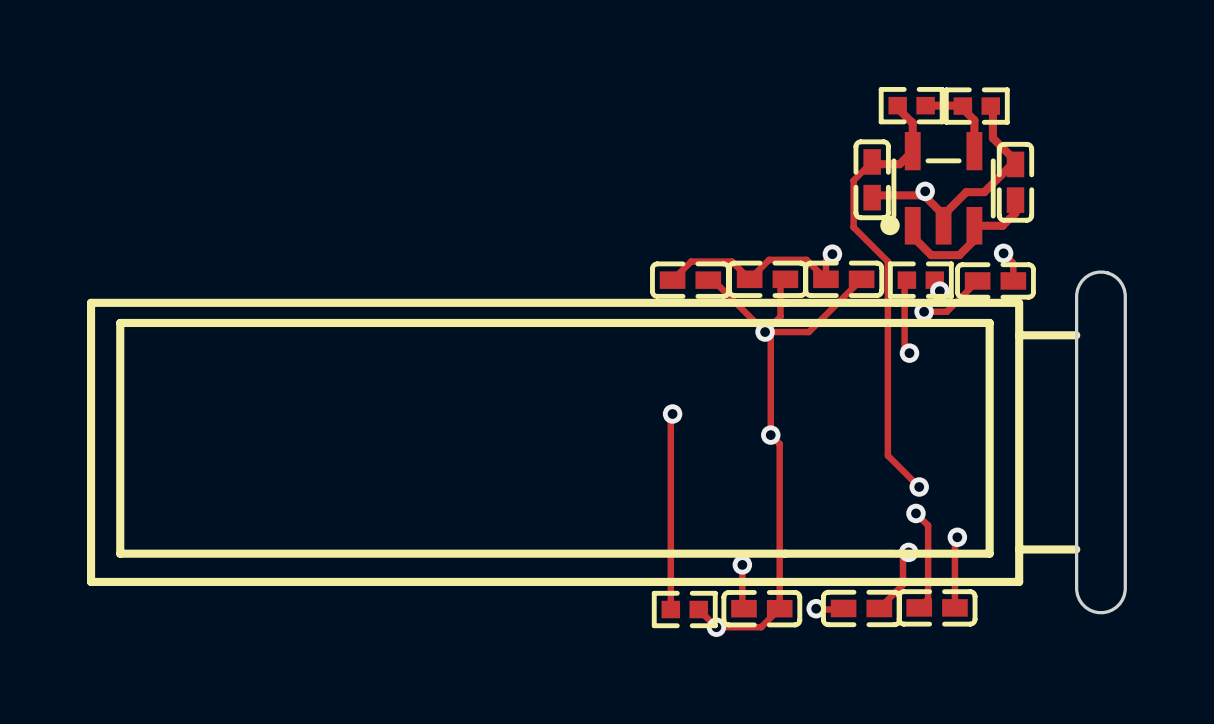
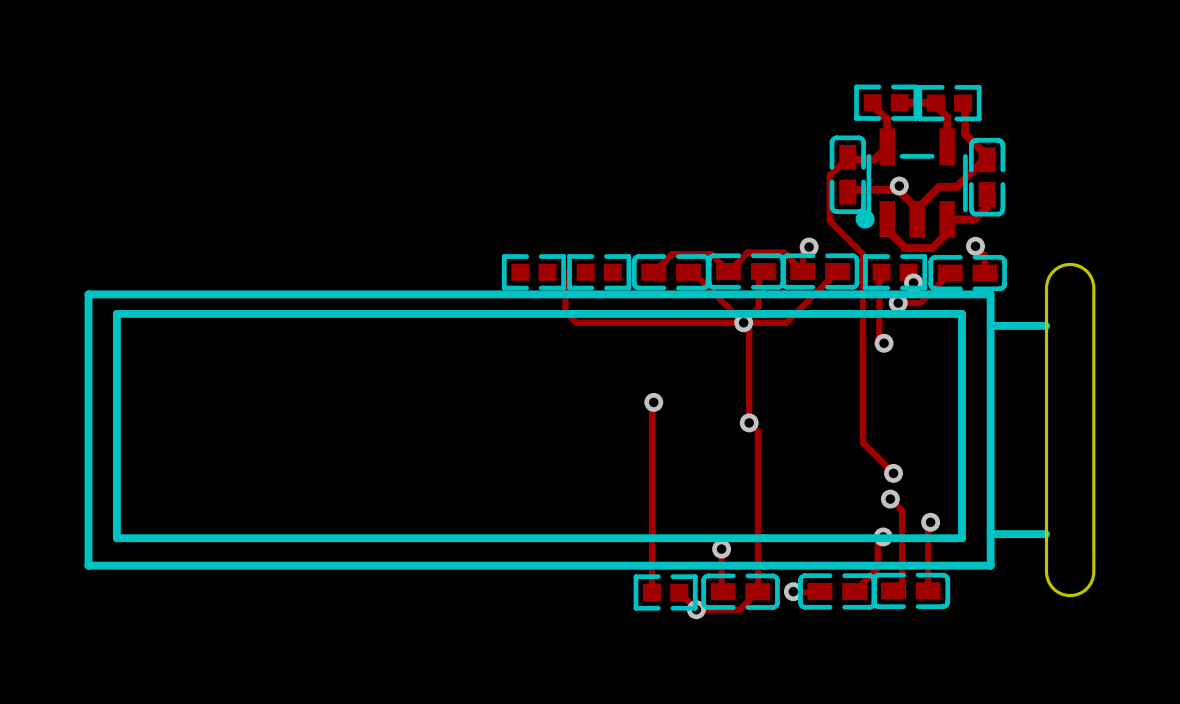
part: none -> (533, 272)
track: none -> (565, 272) (565, 311) (576, 322) (743, 322)
part: none -> (599, 272)

